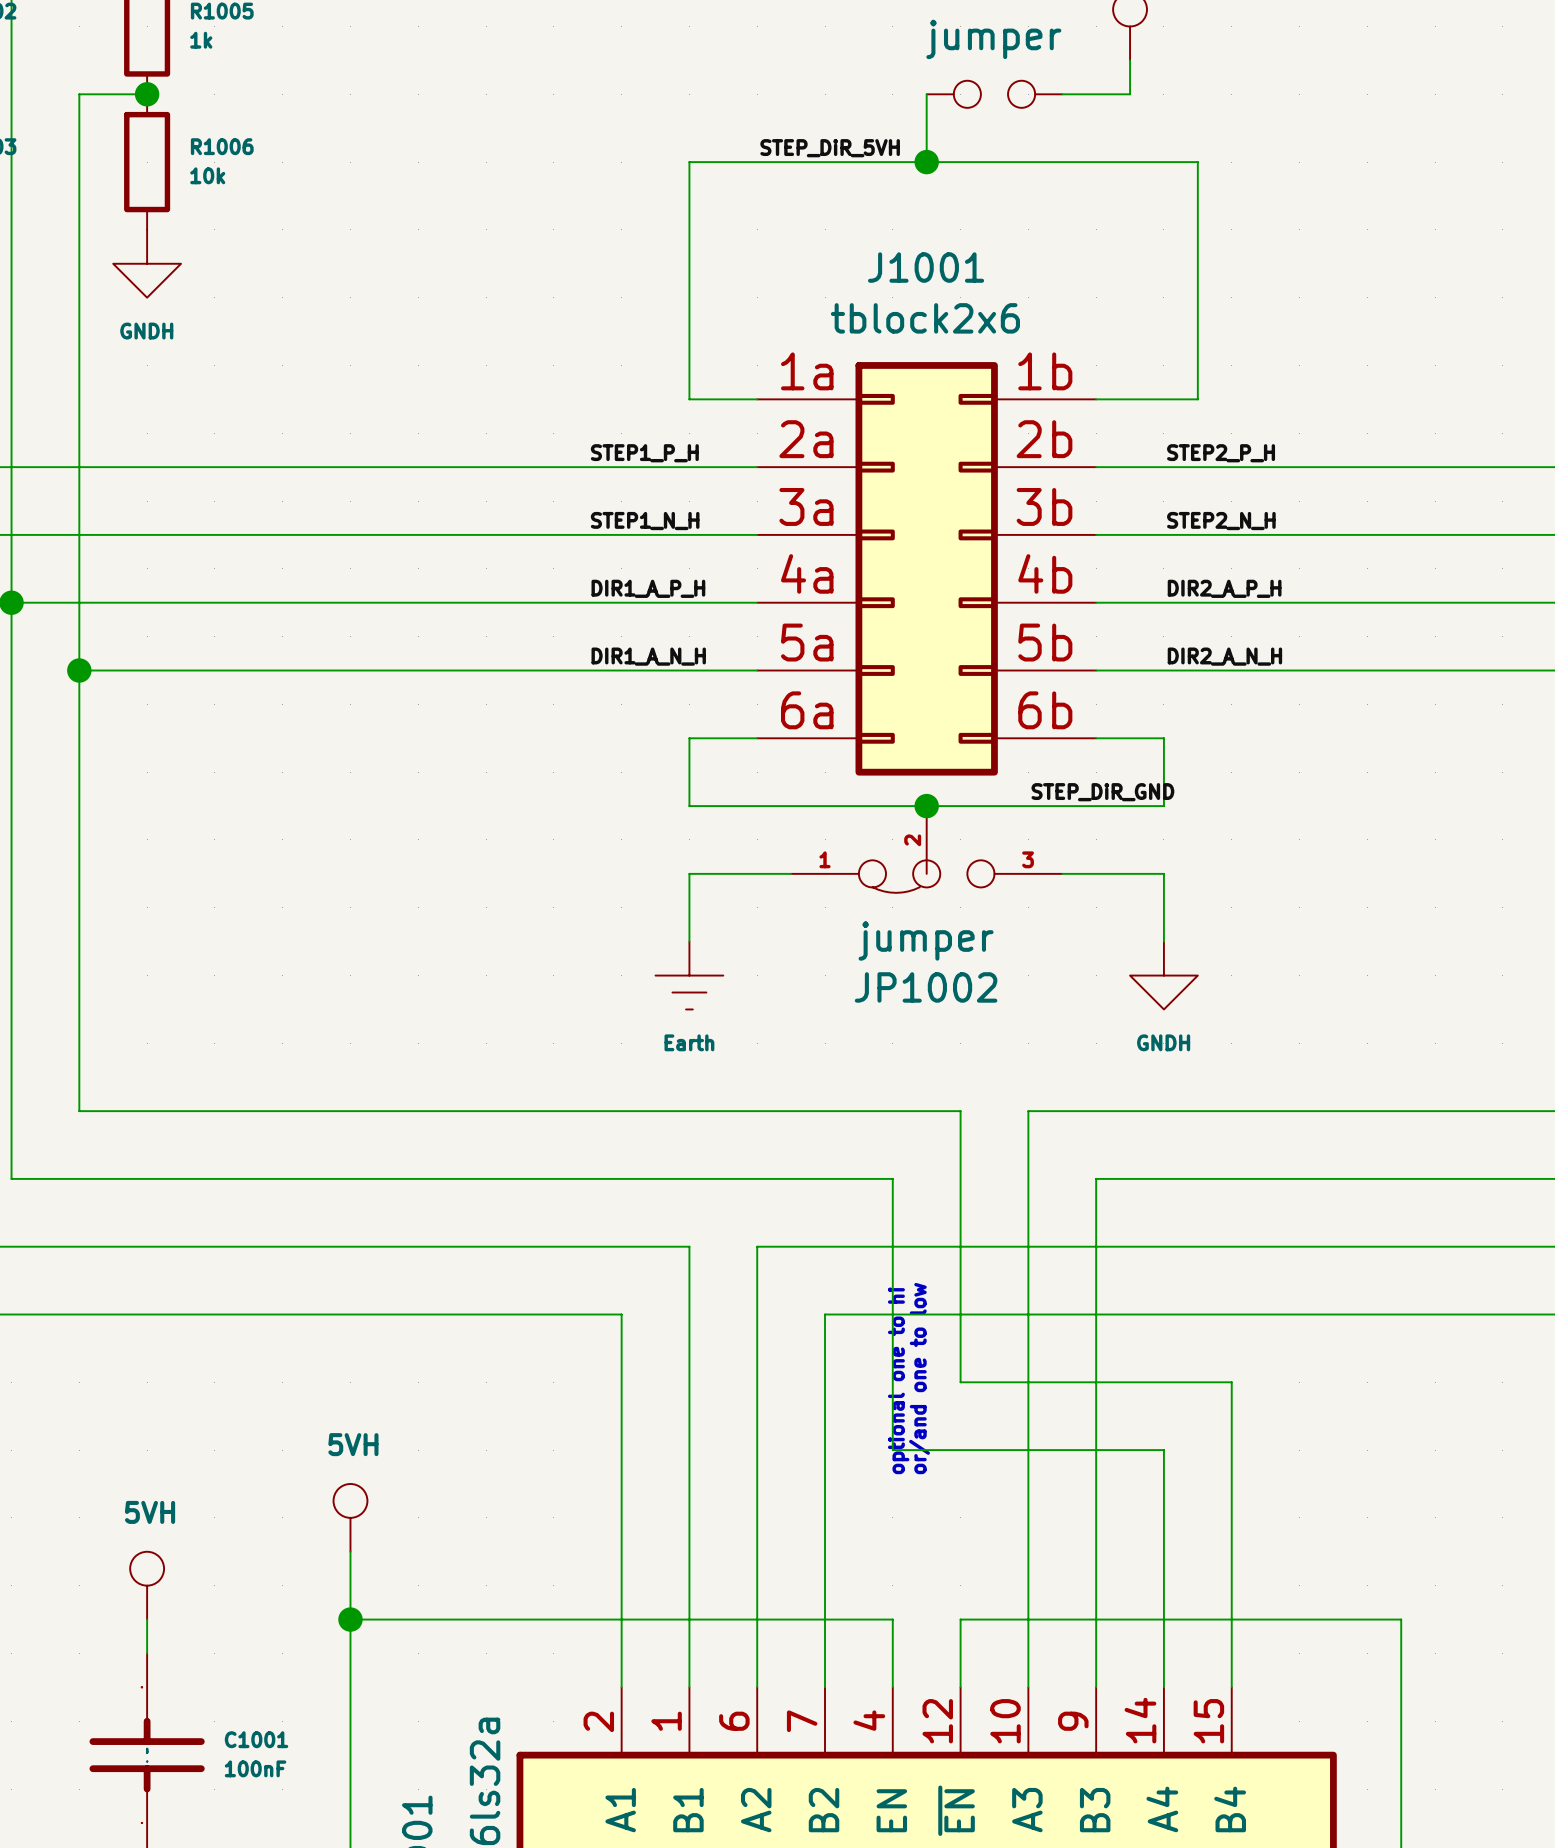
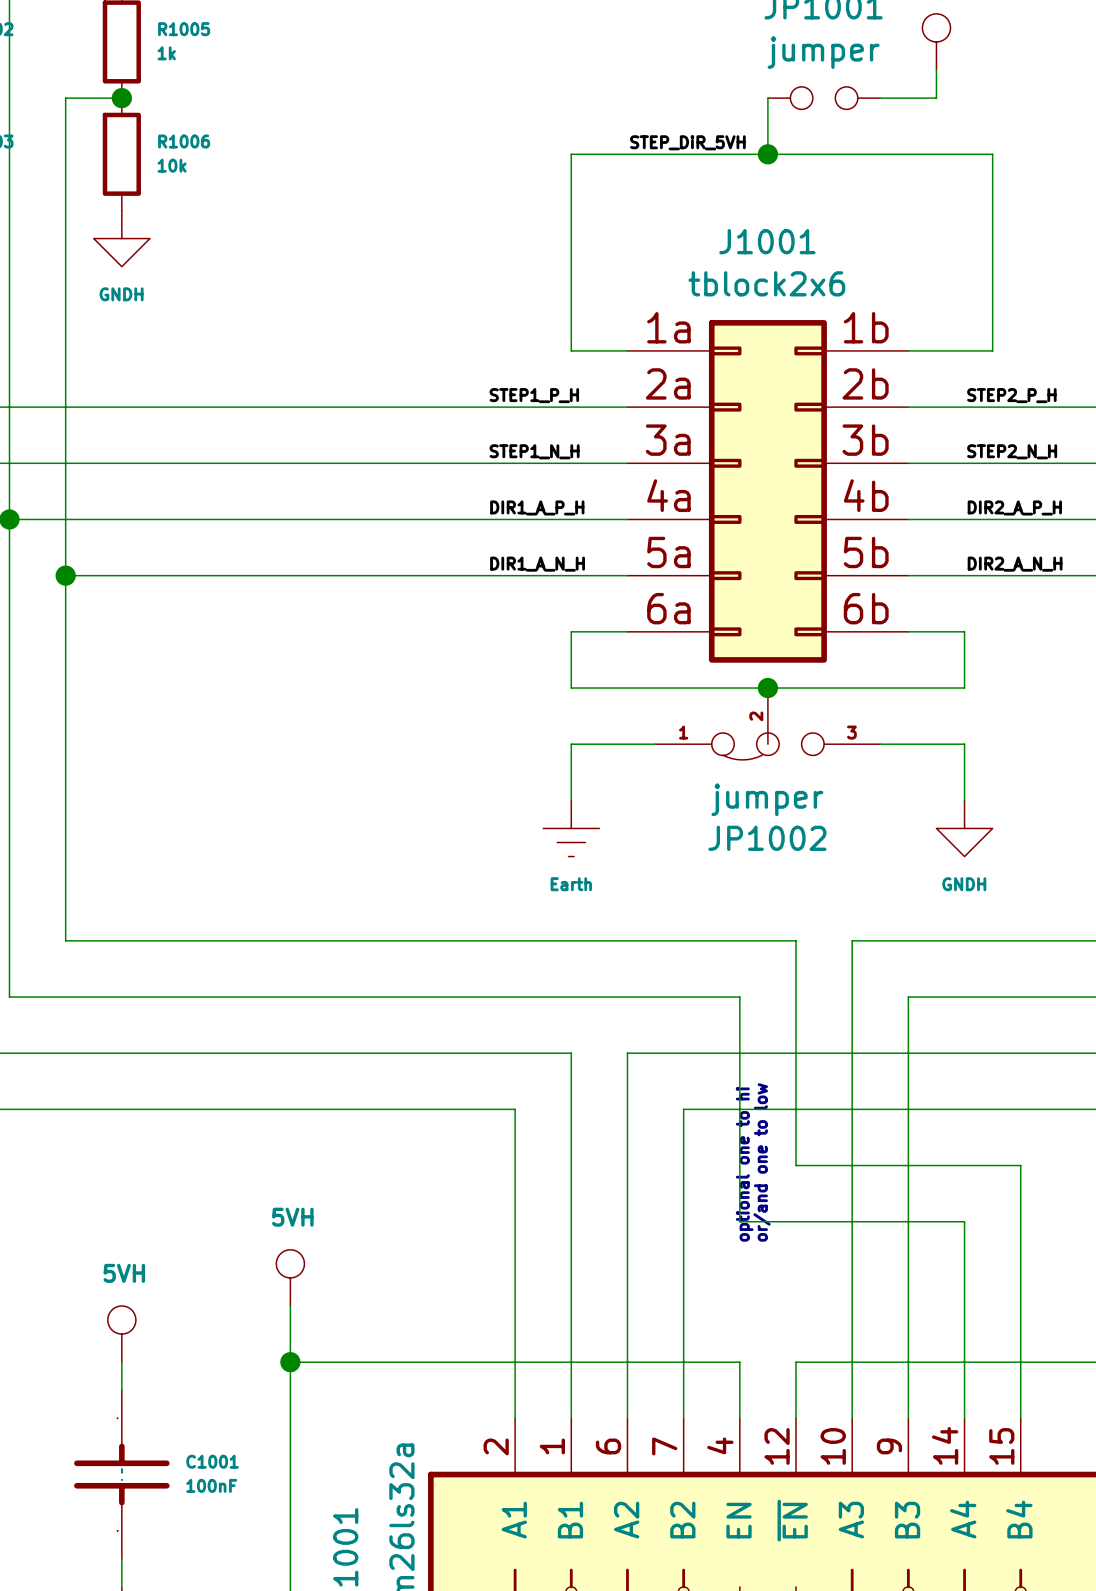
label: STEP_DiR_GND (1102, 792) -> none

